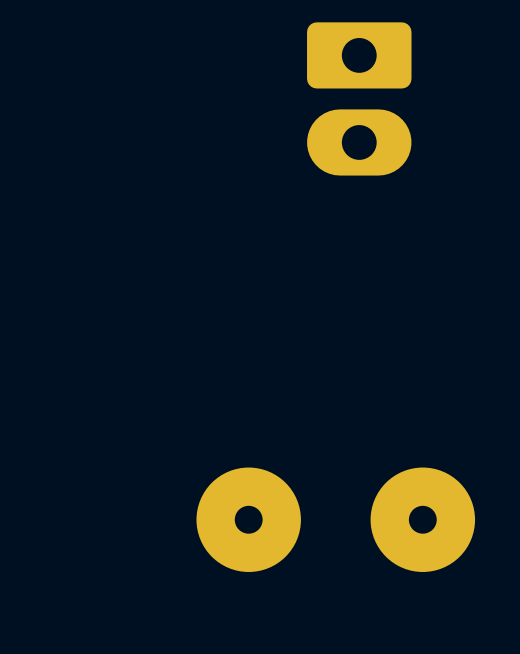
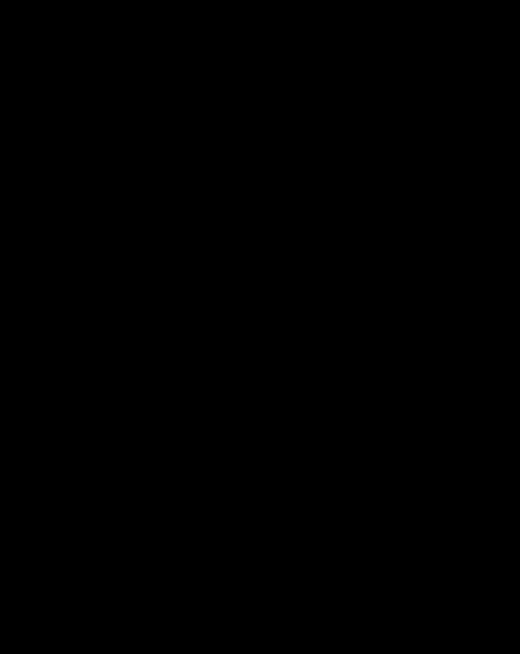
part: (359, 98) -> none
part: (335, 519) -> none

